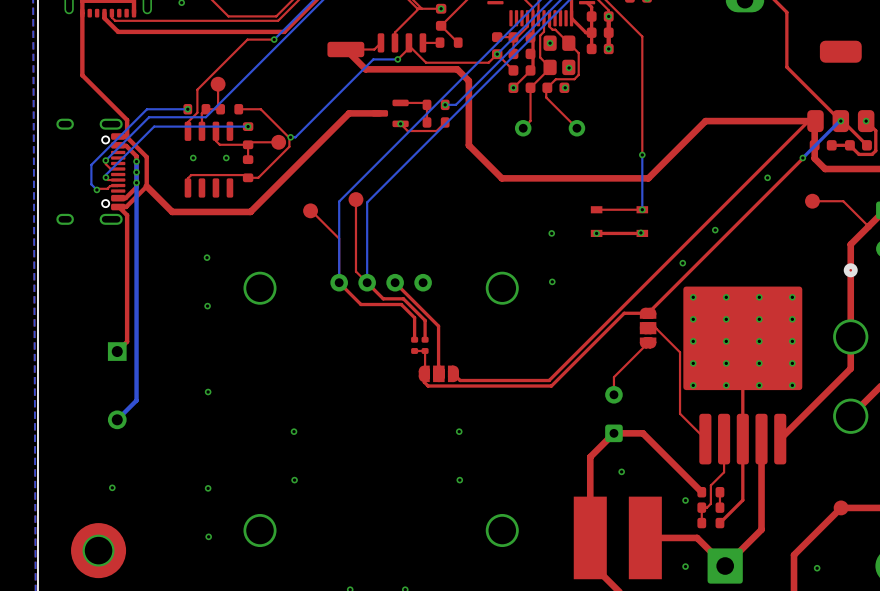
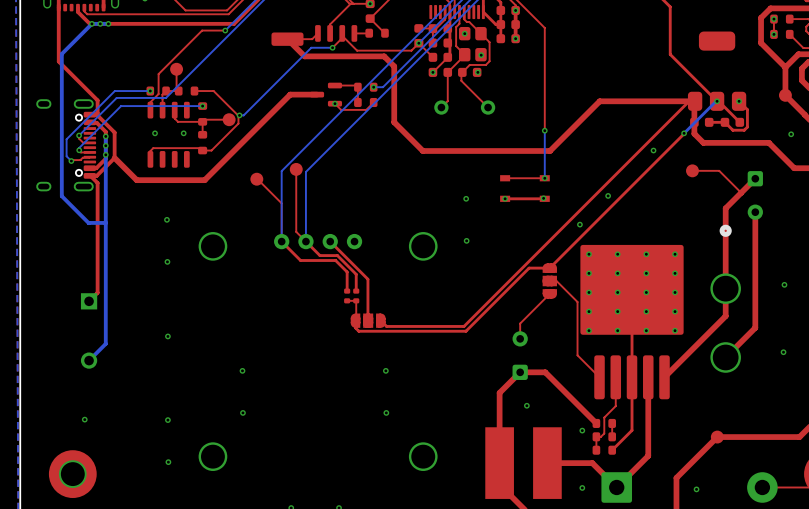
via: none -> (91, 23)
via: none -> (100, 23)
bottom track: none -> (108, 23) (91, 23) (61, 53) (61, 196) (88, 223) (105, 222)
via: none -> (108, 23)

